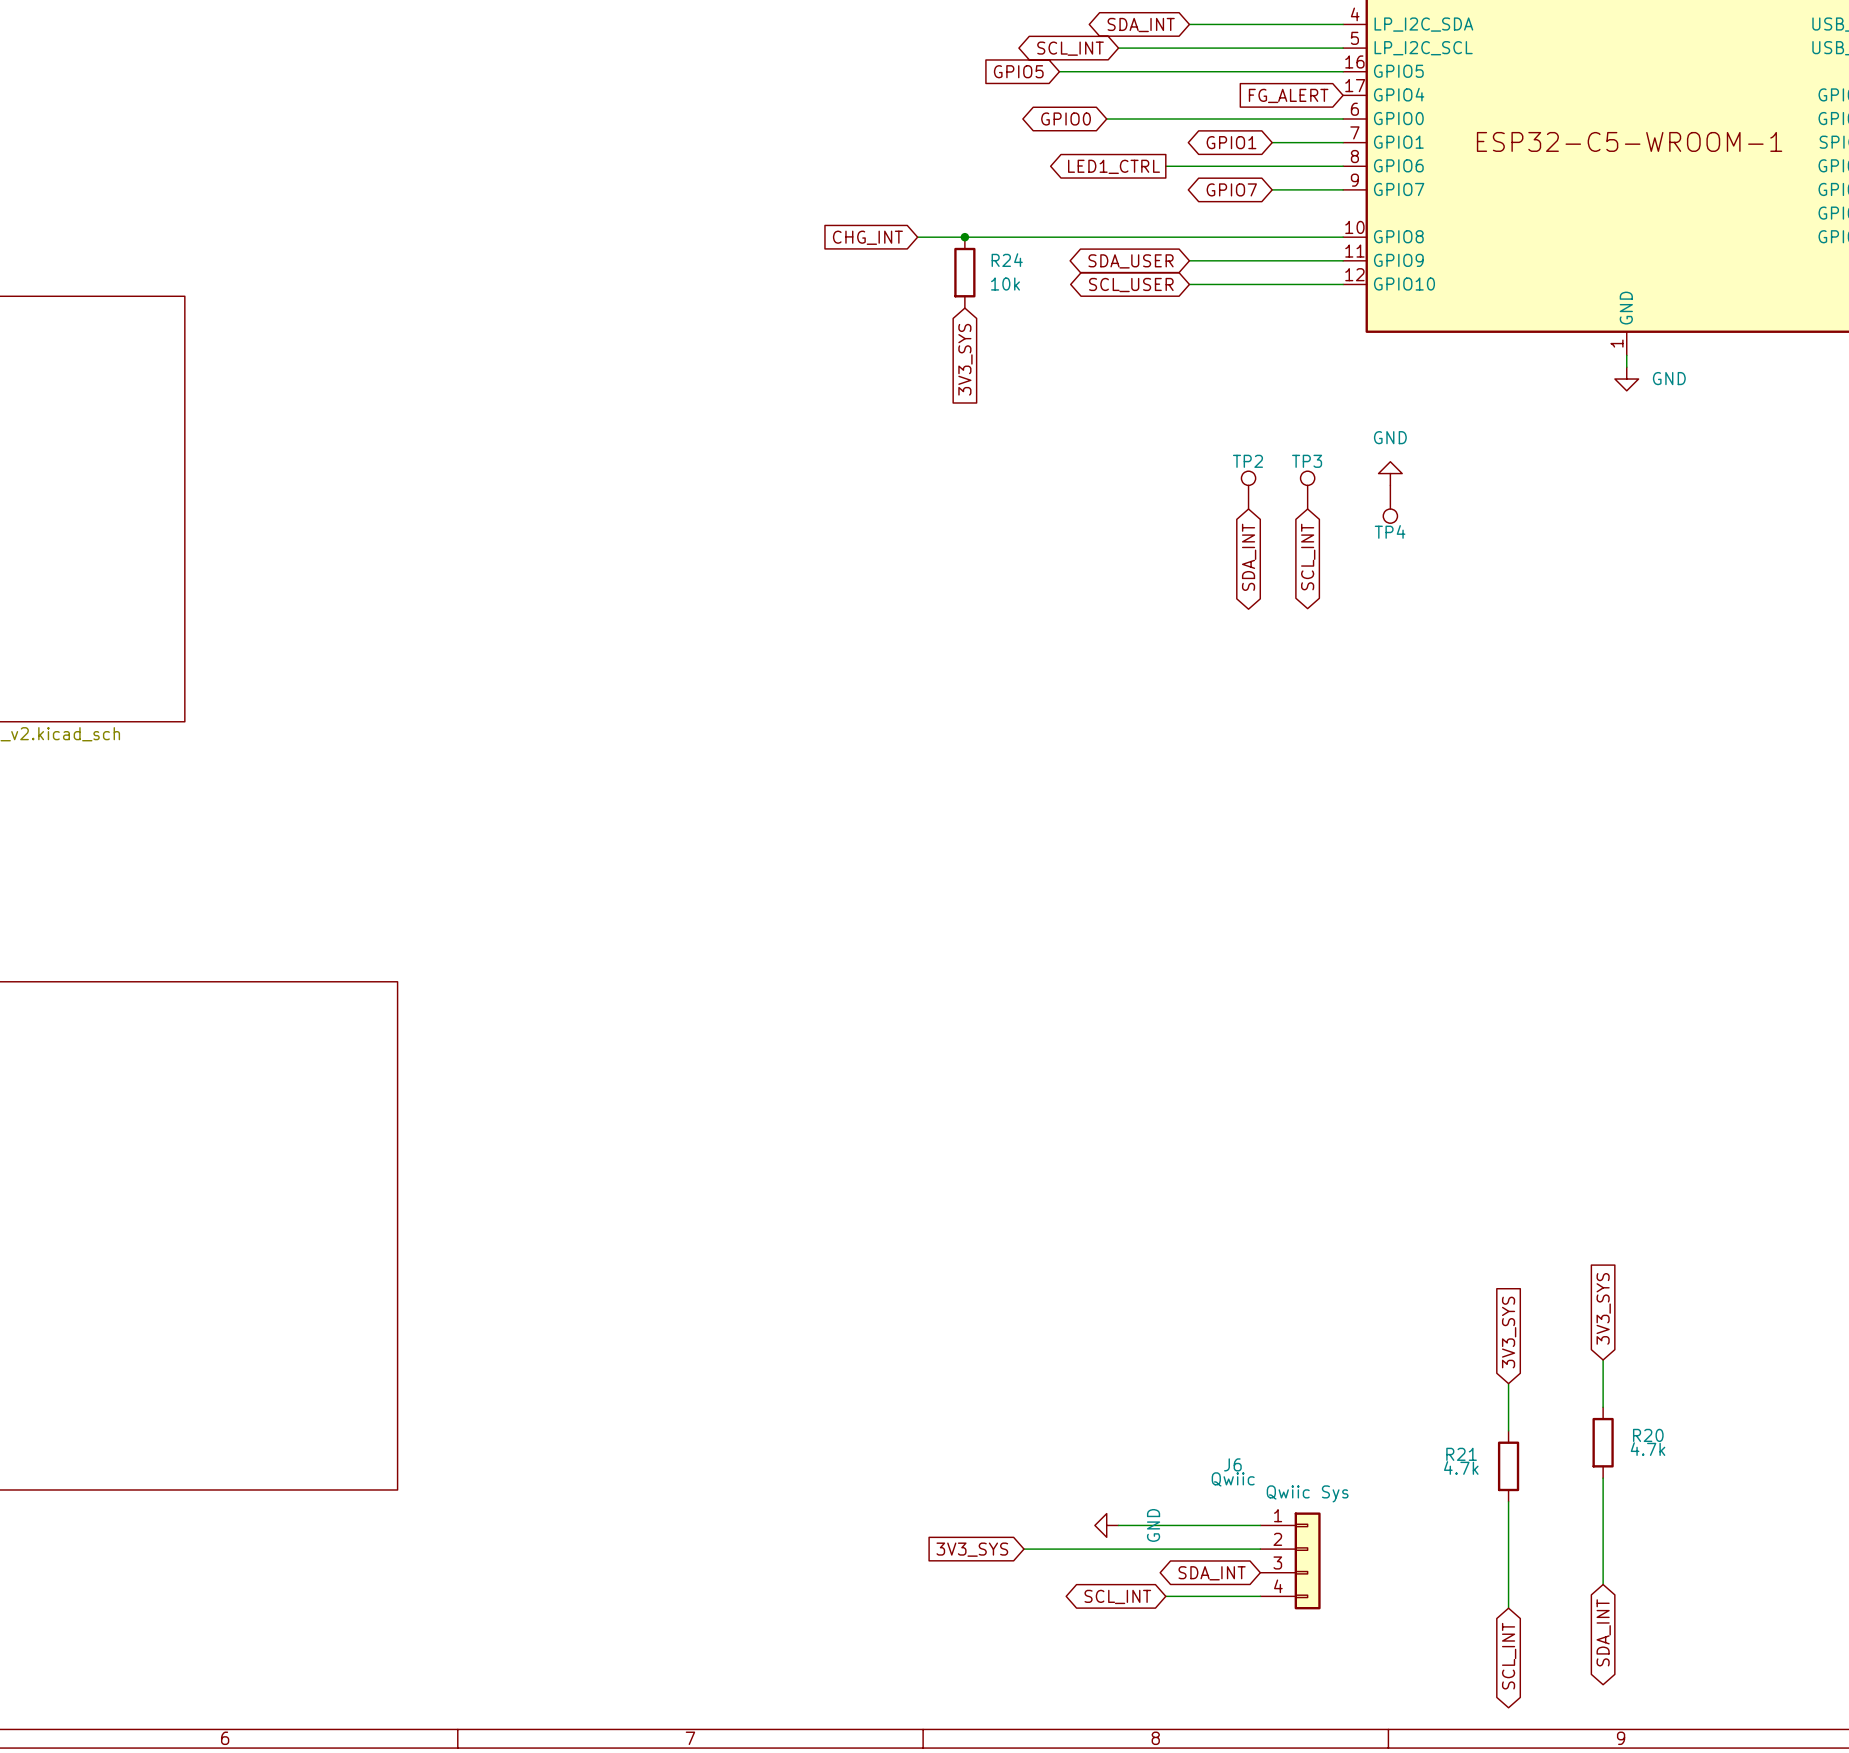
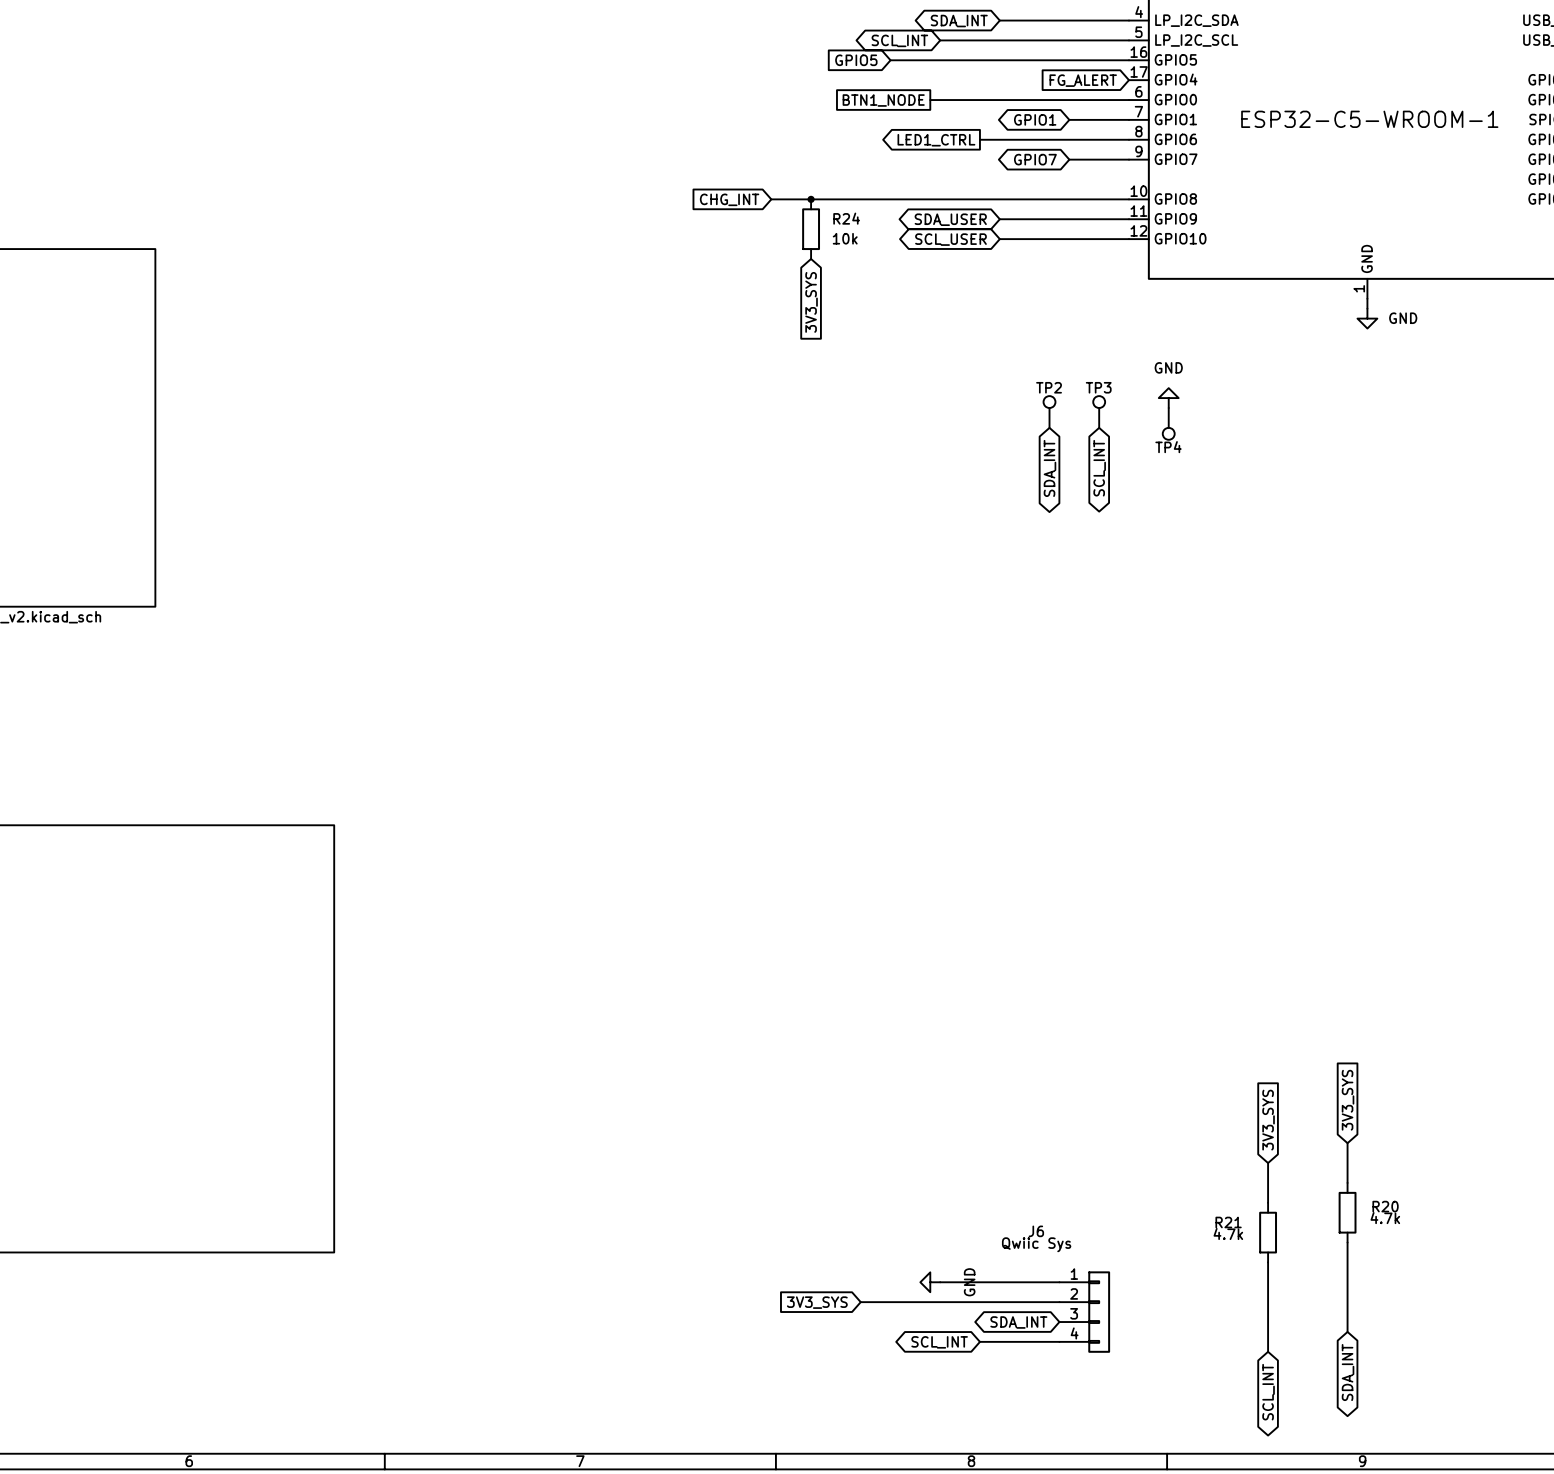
global label shape: bidirectional (1066, 119) -> passive (883, 100)
global label: GPIO0 (1066, 119) -> BTN1_NODE (883, 100)
J6 value: Qwiic (1233, 1479) -> Qwiic Sys (1036, 1244)
J6 text: Qwiic Sys (1307, 1493) -> none

